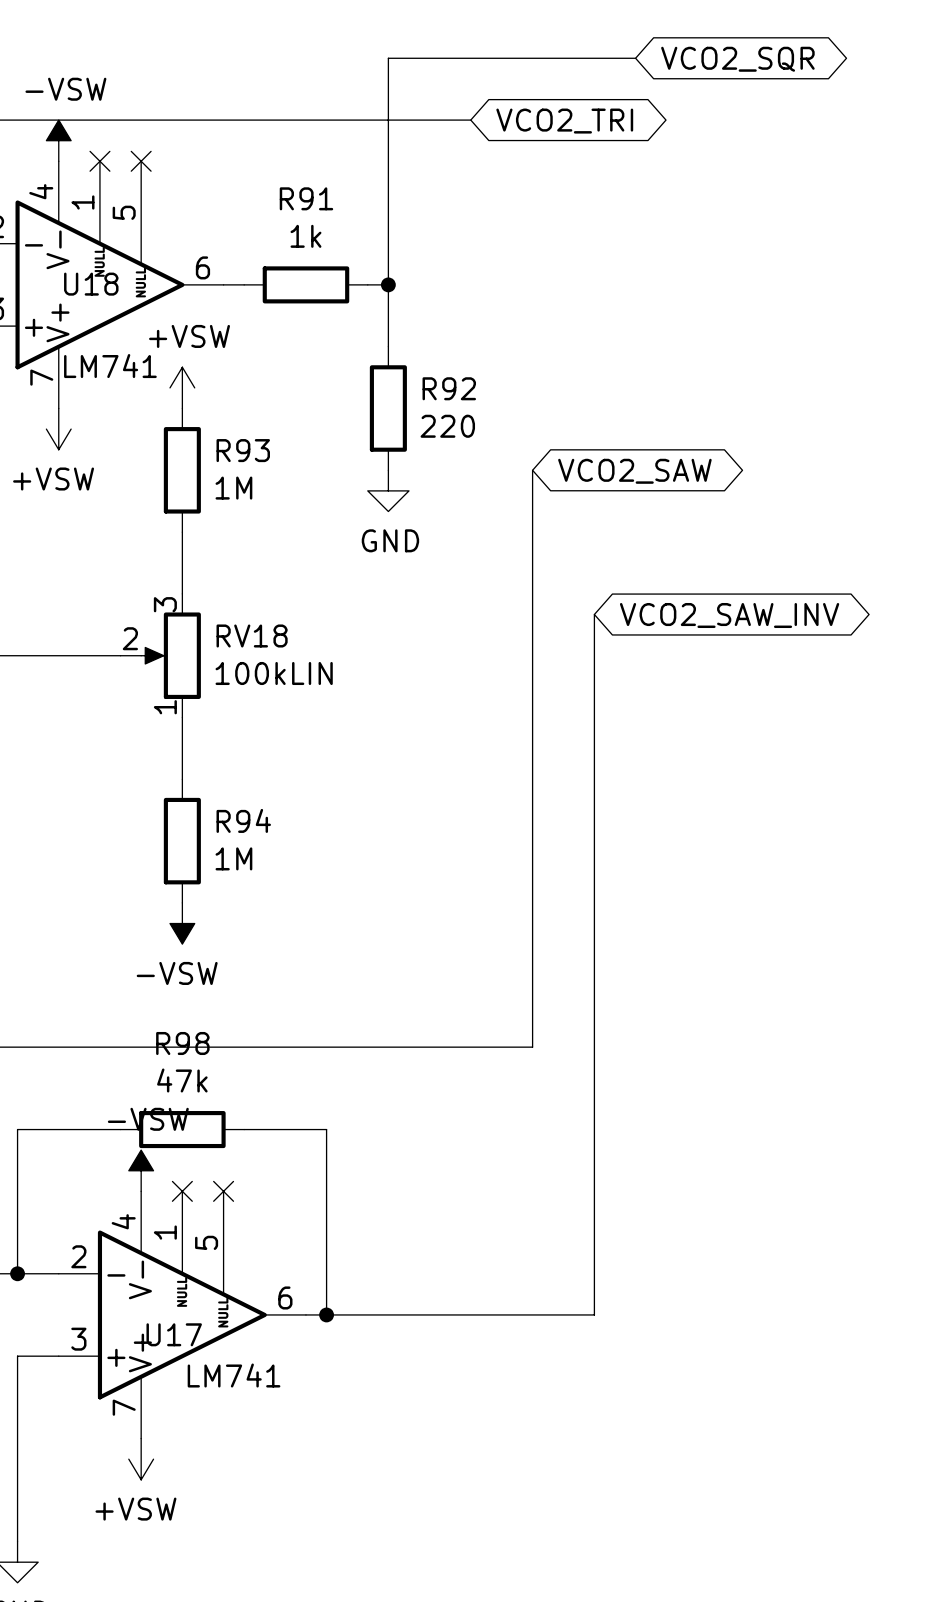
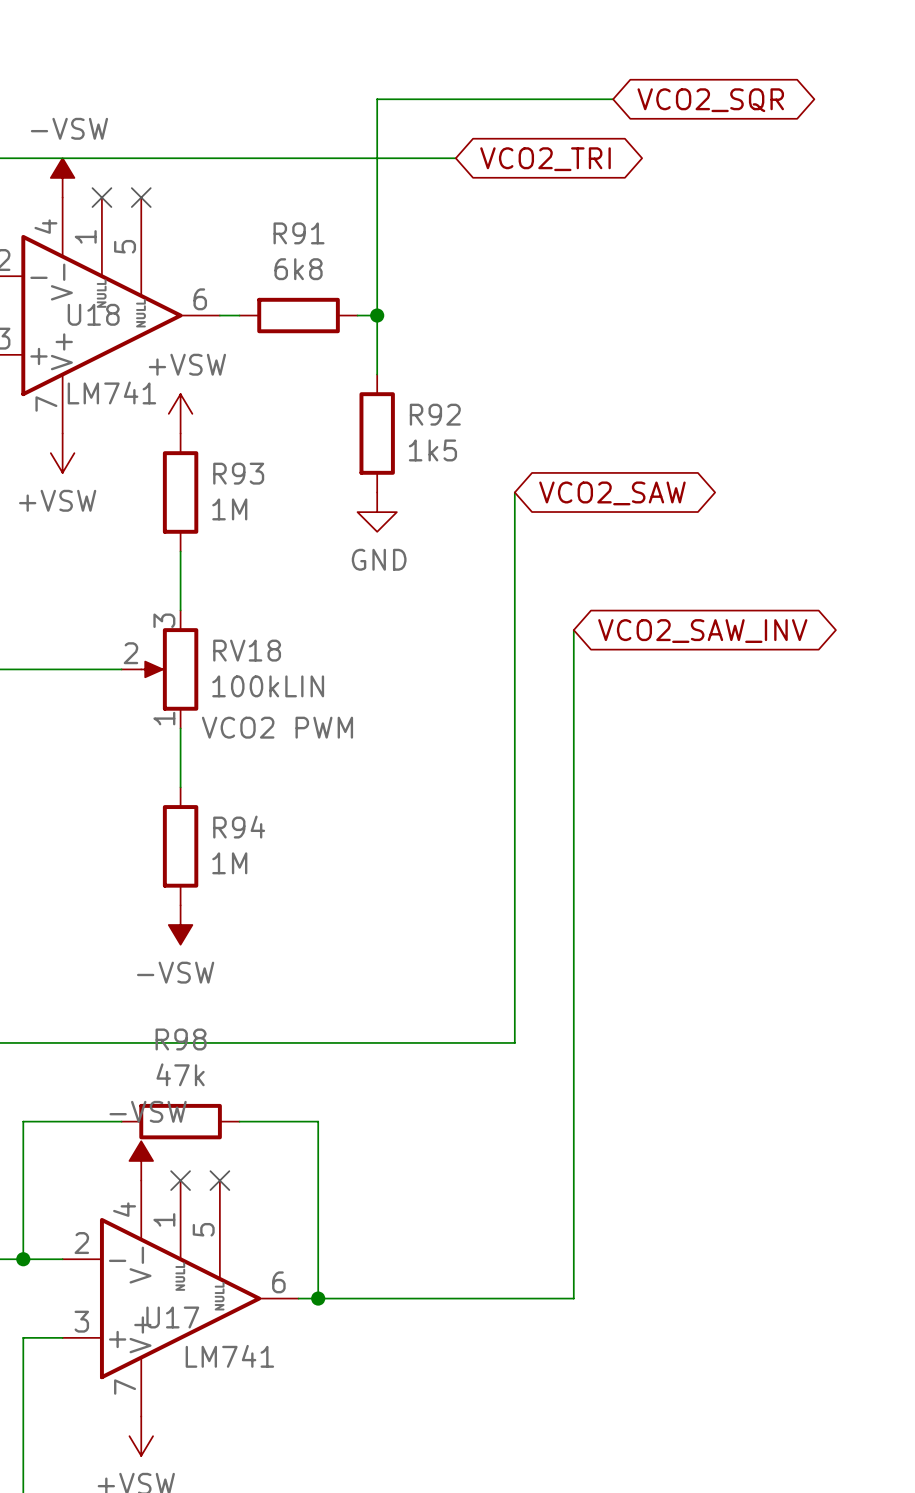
R91 value: 1k (305, 236) -> 6k8 (298, 269)
R92 value: 220 (447, 426) -> 1k5 (432, 450)
RV18 text: none -> VCO2 PWM (277, 727)

